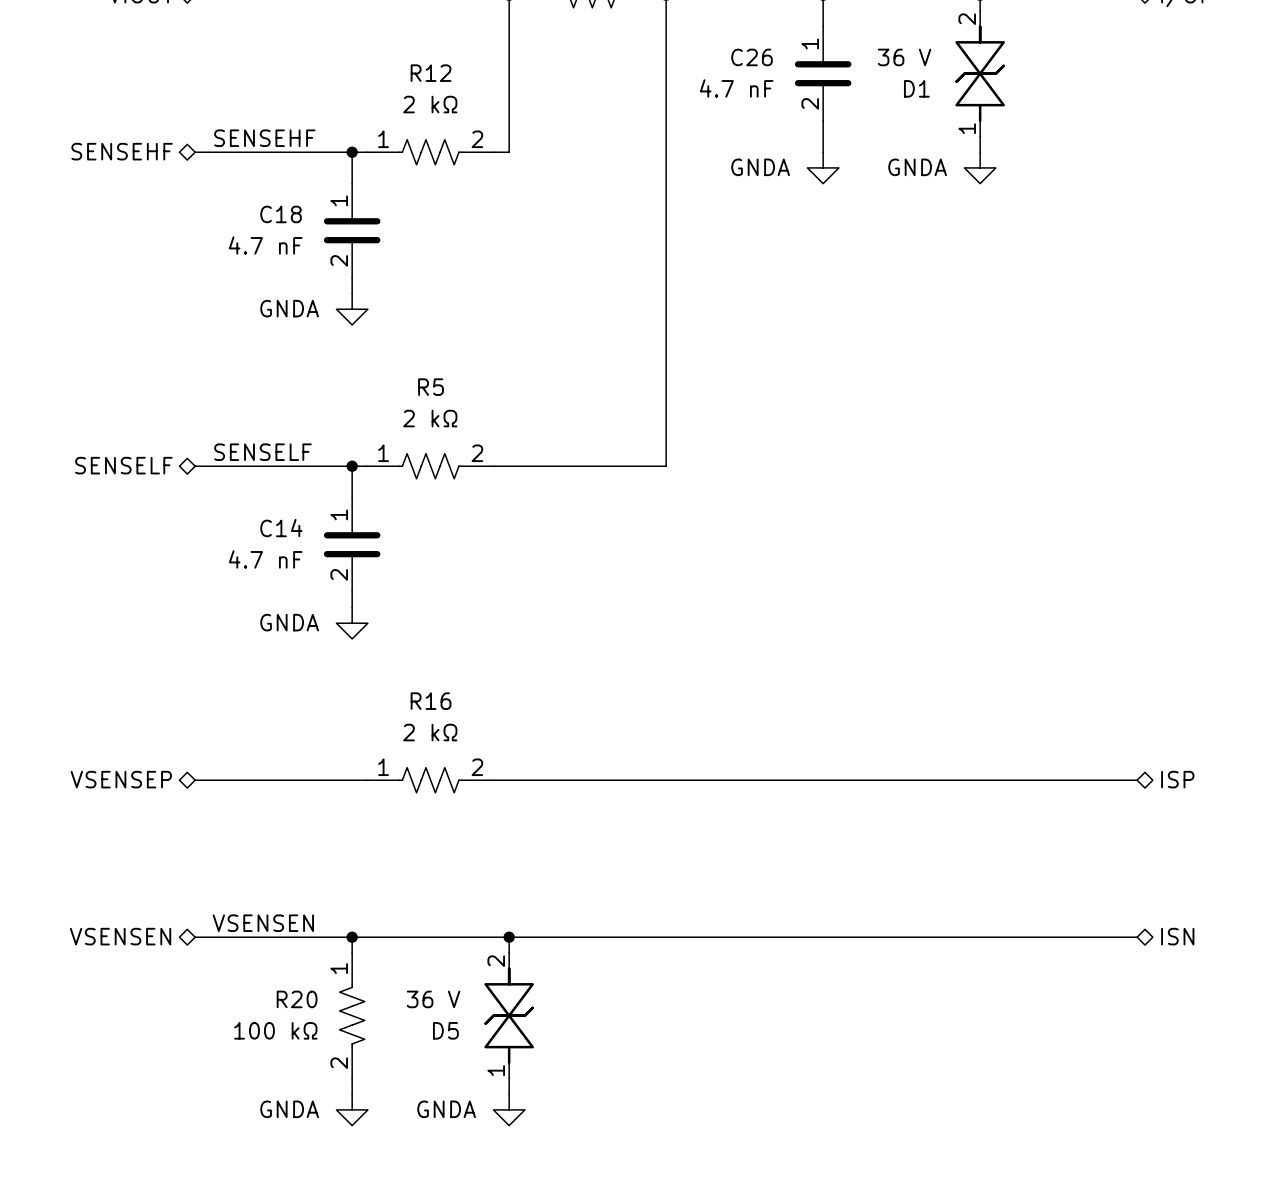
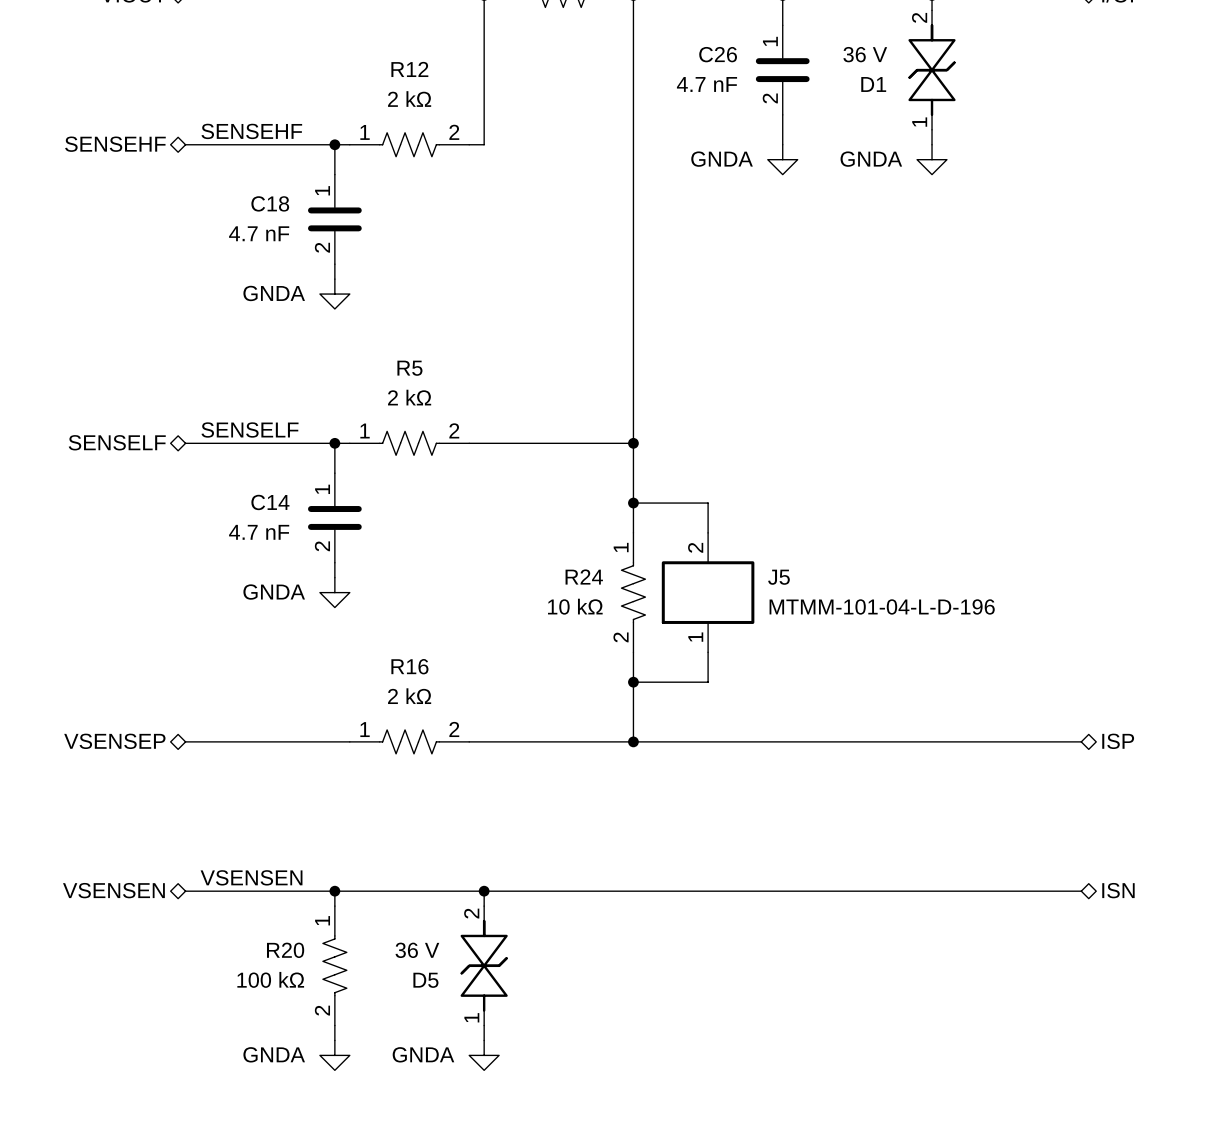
wire: none -> (633, 443) (633, 532)
junction: none -> (633, 443)
wire: none -> (633, 503) (708, 503) (708, 532)
junction: none -> (633, 503)
R24: none -> 10 kΩ (633, 592)
J5: none -> MTMM-101-04-L-D-196 (708, 592)
wire: none -> (633, 652) (633, 741)
wire: none -> (708, 652) (708, 682) (633, 682)
junction: none -> (633, 682)
junction: none -> (633, 741)

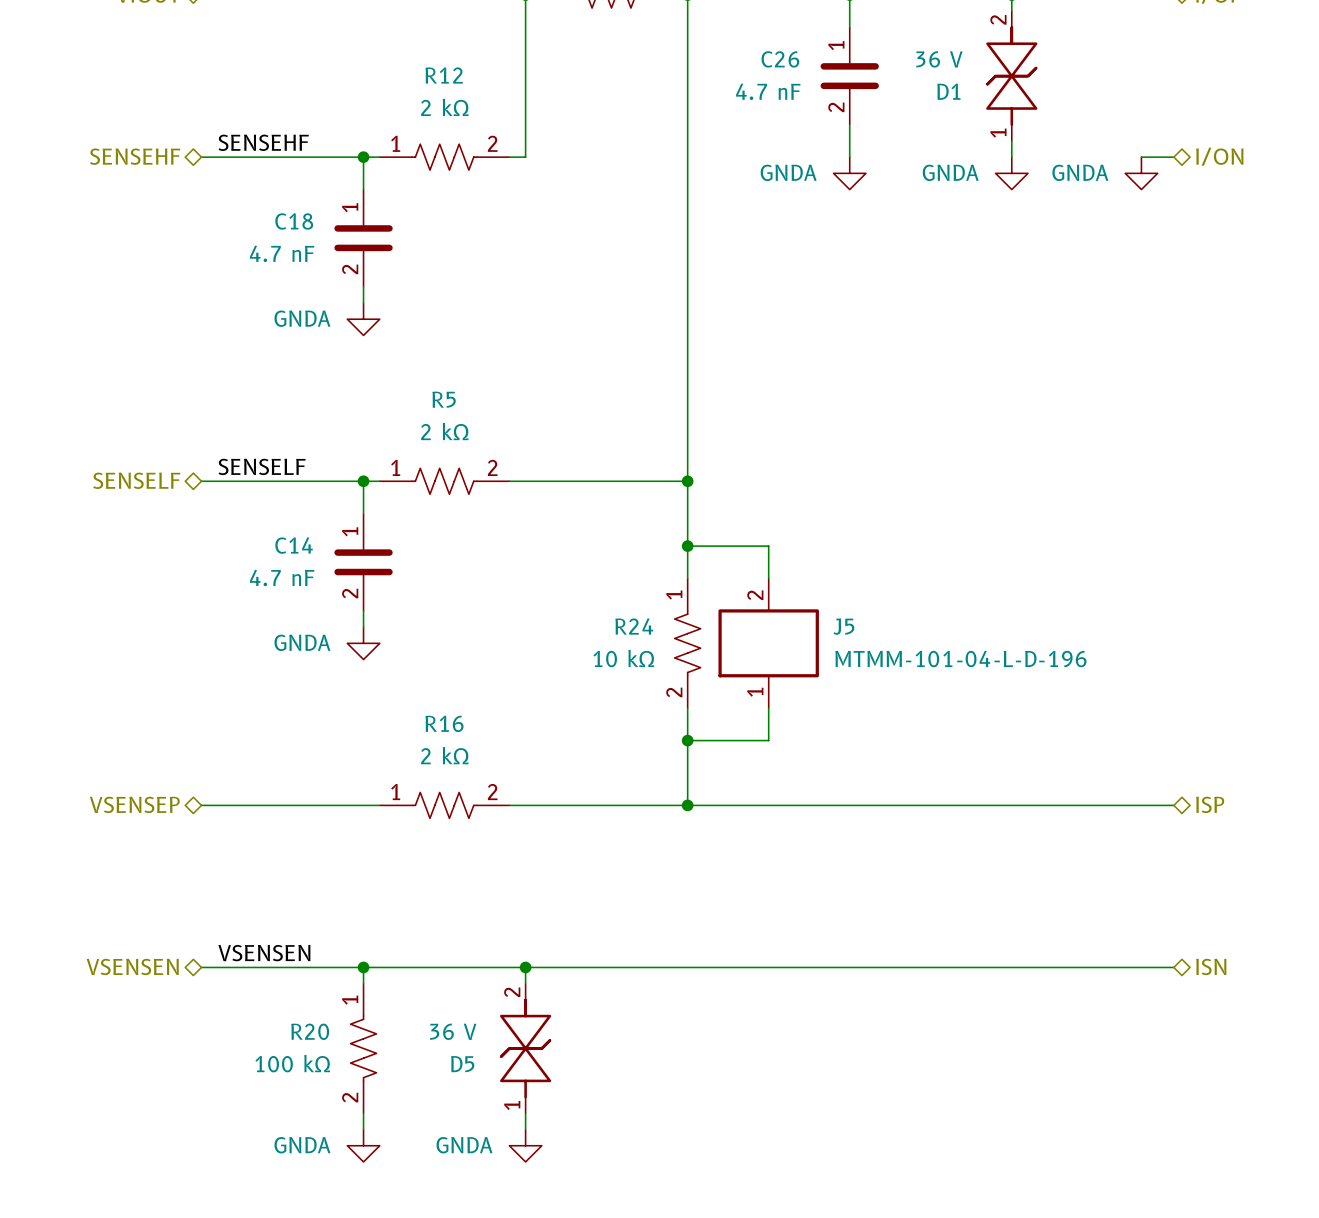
hierarchical label: none -> I/ON (1219, 156)
wire: none -> (1141, 157) (1173, 157)
power symbol: none -> GNDA (1141, 173)

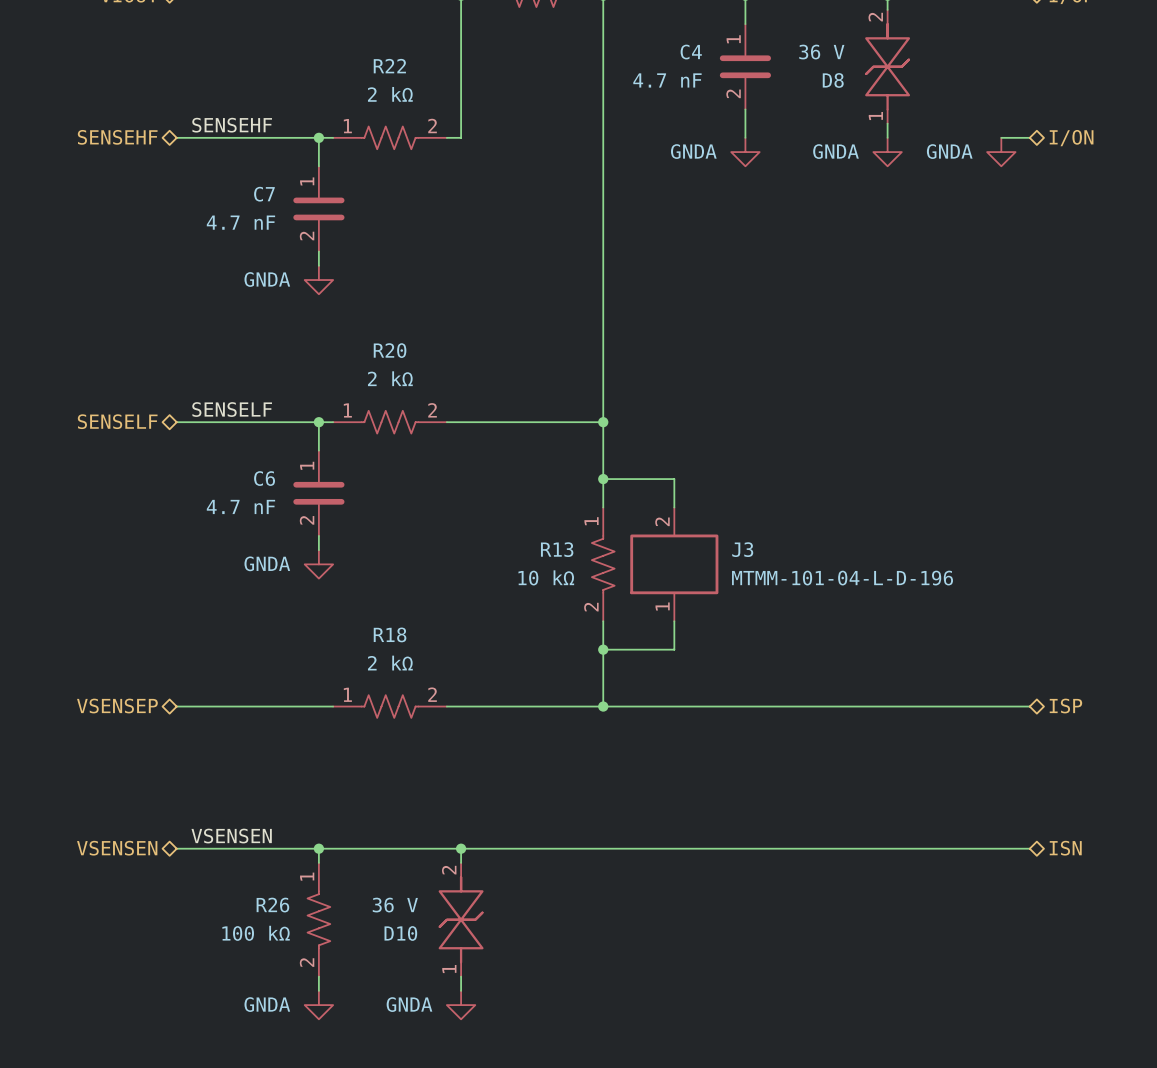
C26 name: C26 (780, 59) -> C4 (691, 52)
R12 name: R12 (444, 75) -> R22 (389, 66)
D1 name: D1 (948, 91) -> D8 (833, 80)
C18 name: C18 (294, 221) -> C7 (264, 194)
R5 name: R5 (444, 399) -> R20 (390, 350)
C14 name: C14 (294, 545) -> C6 (264, 478)
R24 name: R24 (634, 626) -> R13 (557, 549)
J5 name: J5 (843, 626) -> J3 (742, 549)
R16 name: R16 (444, 723) -> R18 (390, 634)
R20 name: R20 (310, 1031) -> R26 (272, 905)
D5 name: D5 (462, 1064) -> D10 (400, 933)

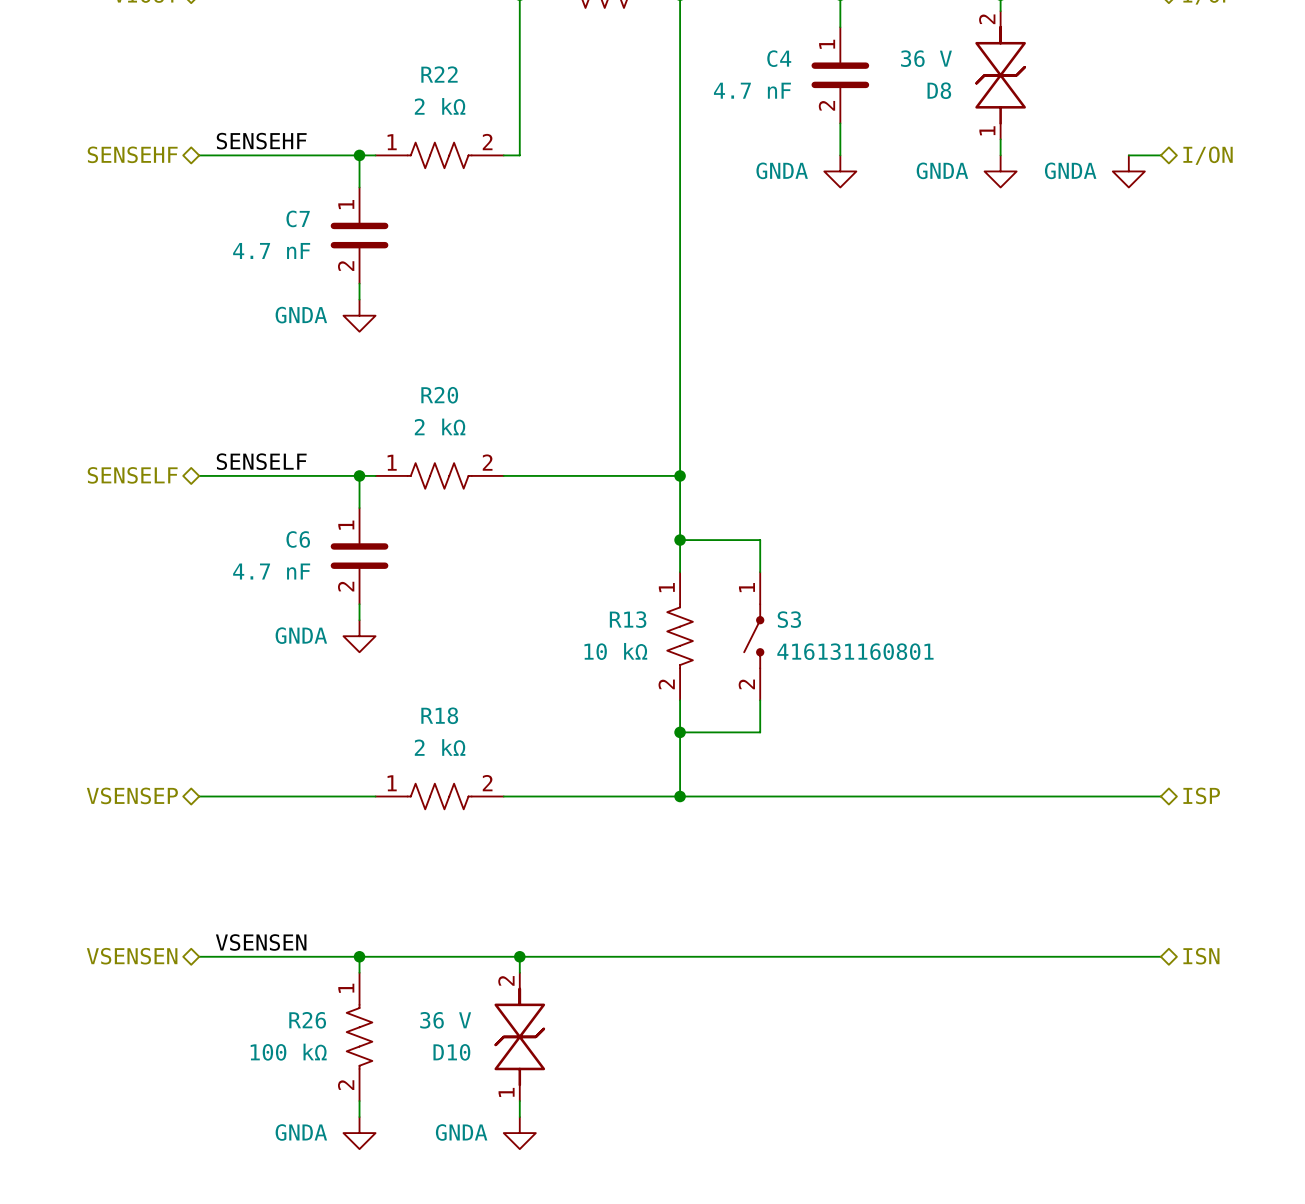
S3: none -> 416131160801 (753, 636)
J3: MTMM-101-04-L-D-196 (674, 564) -> none

